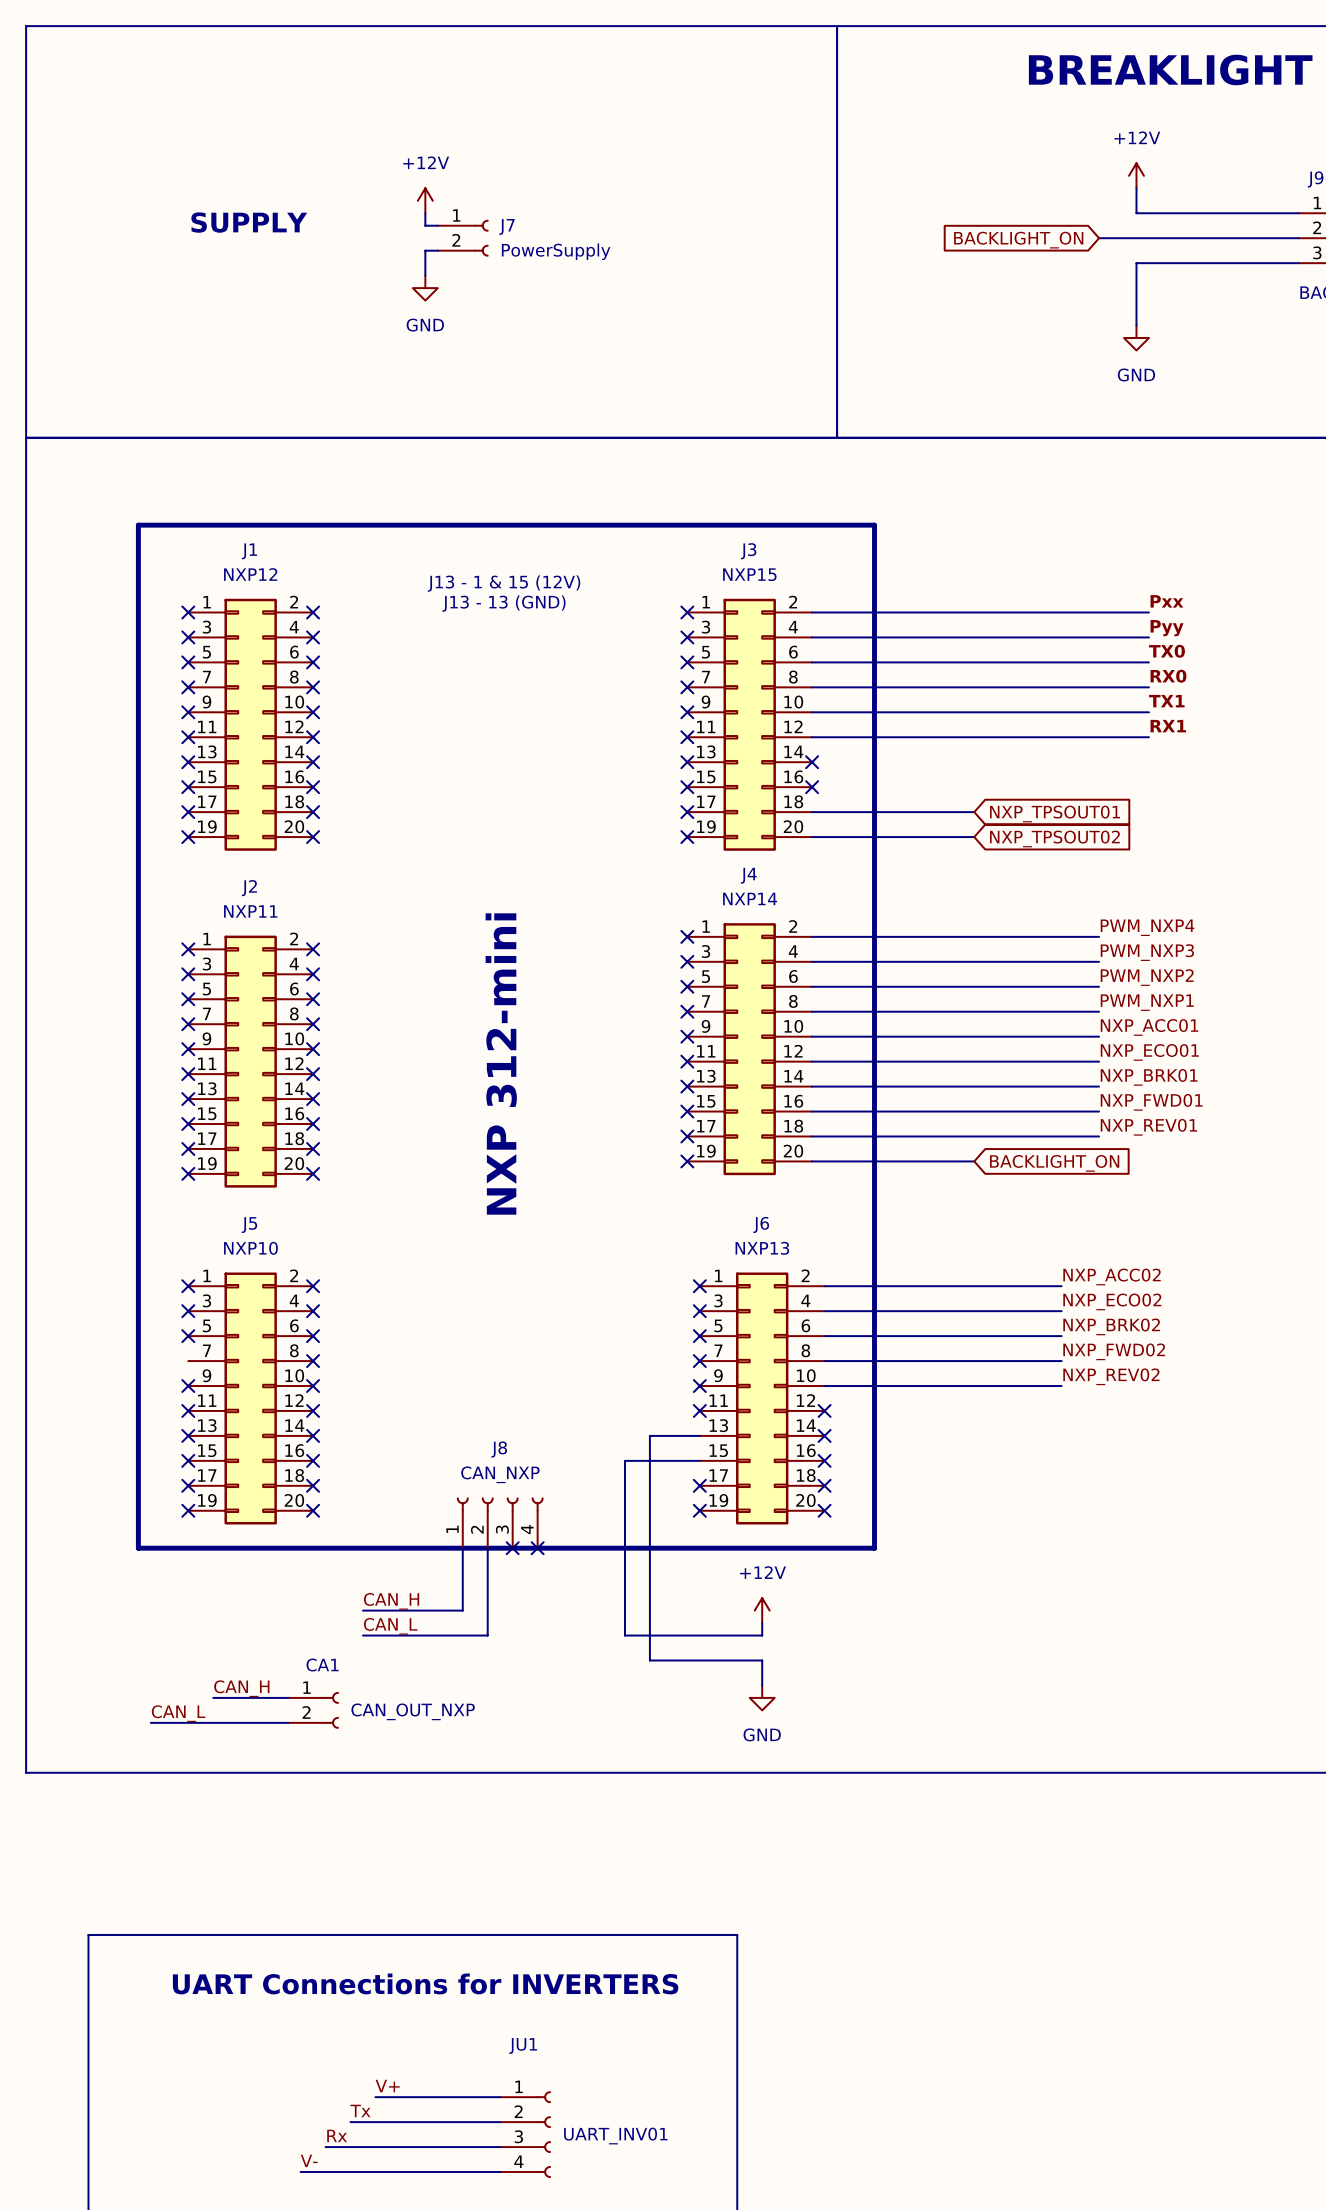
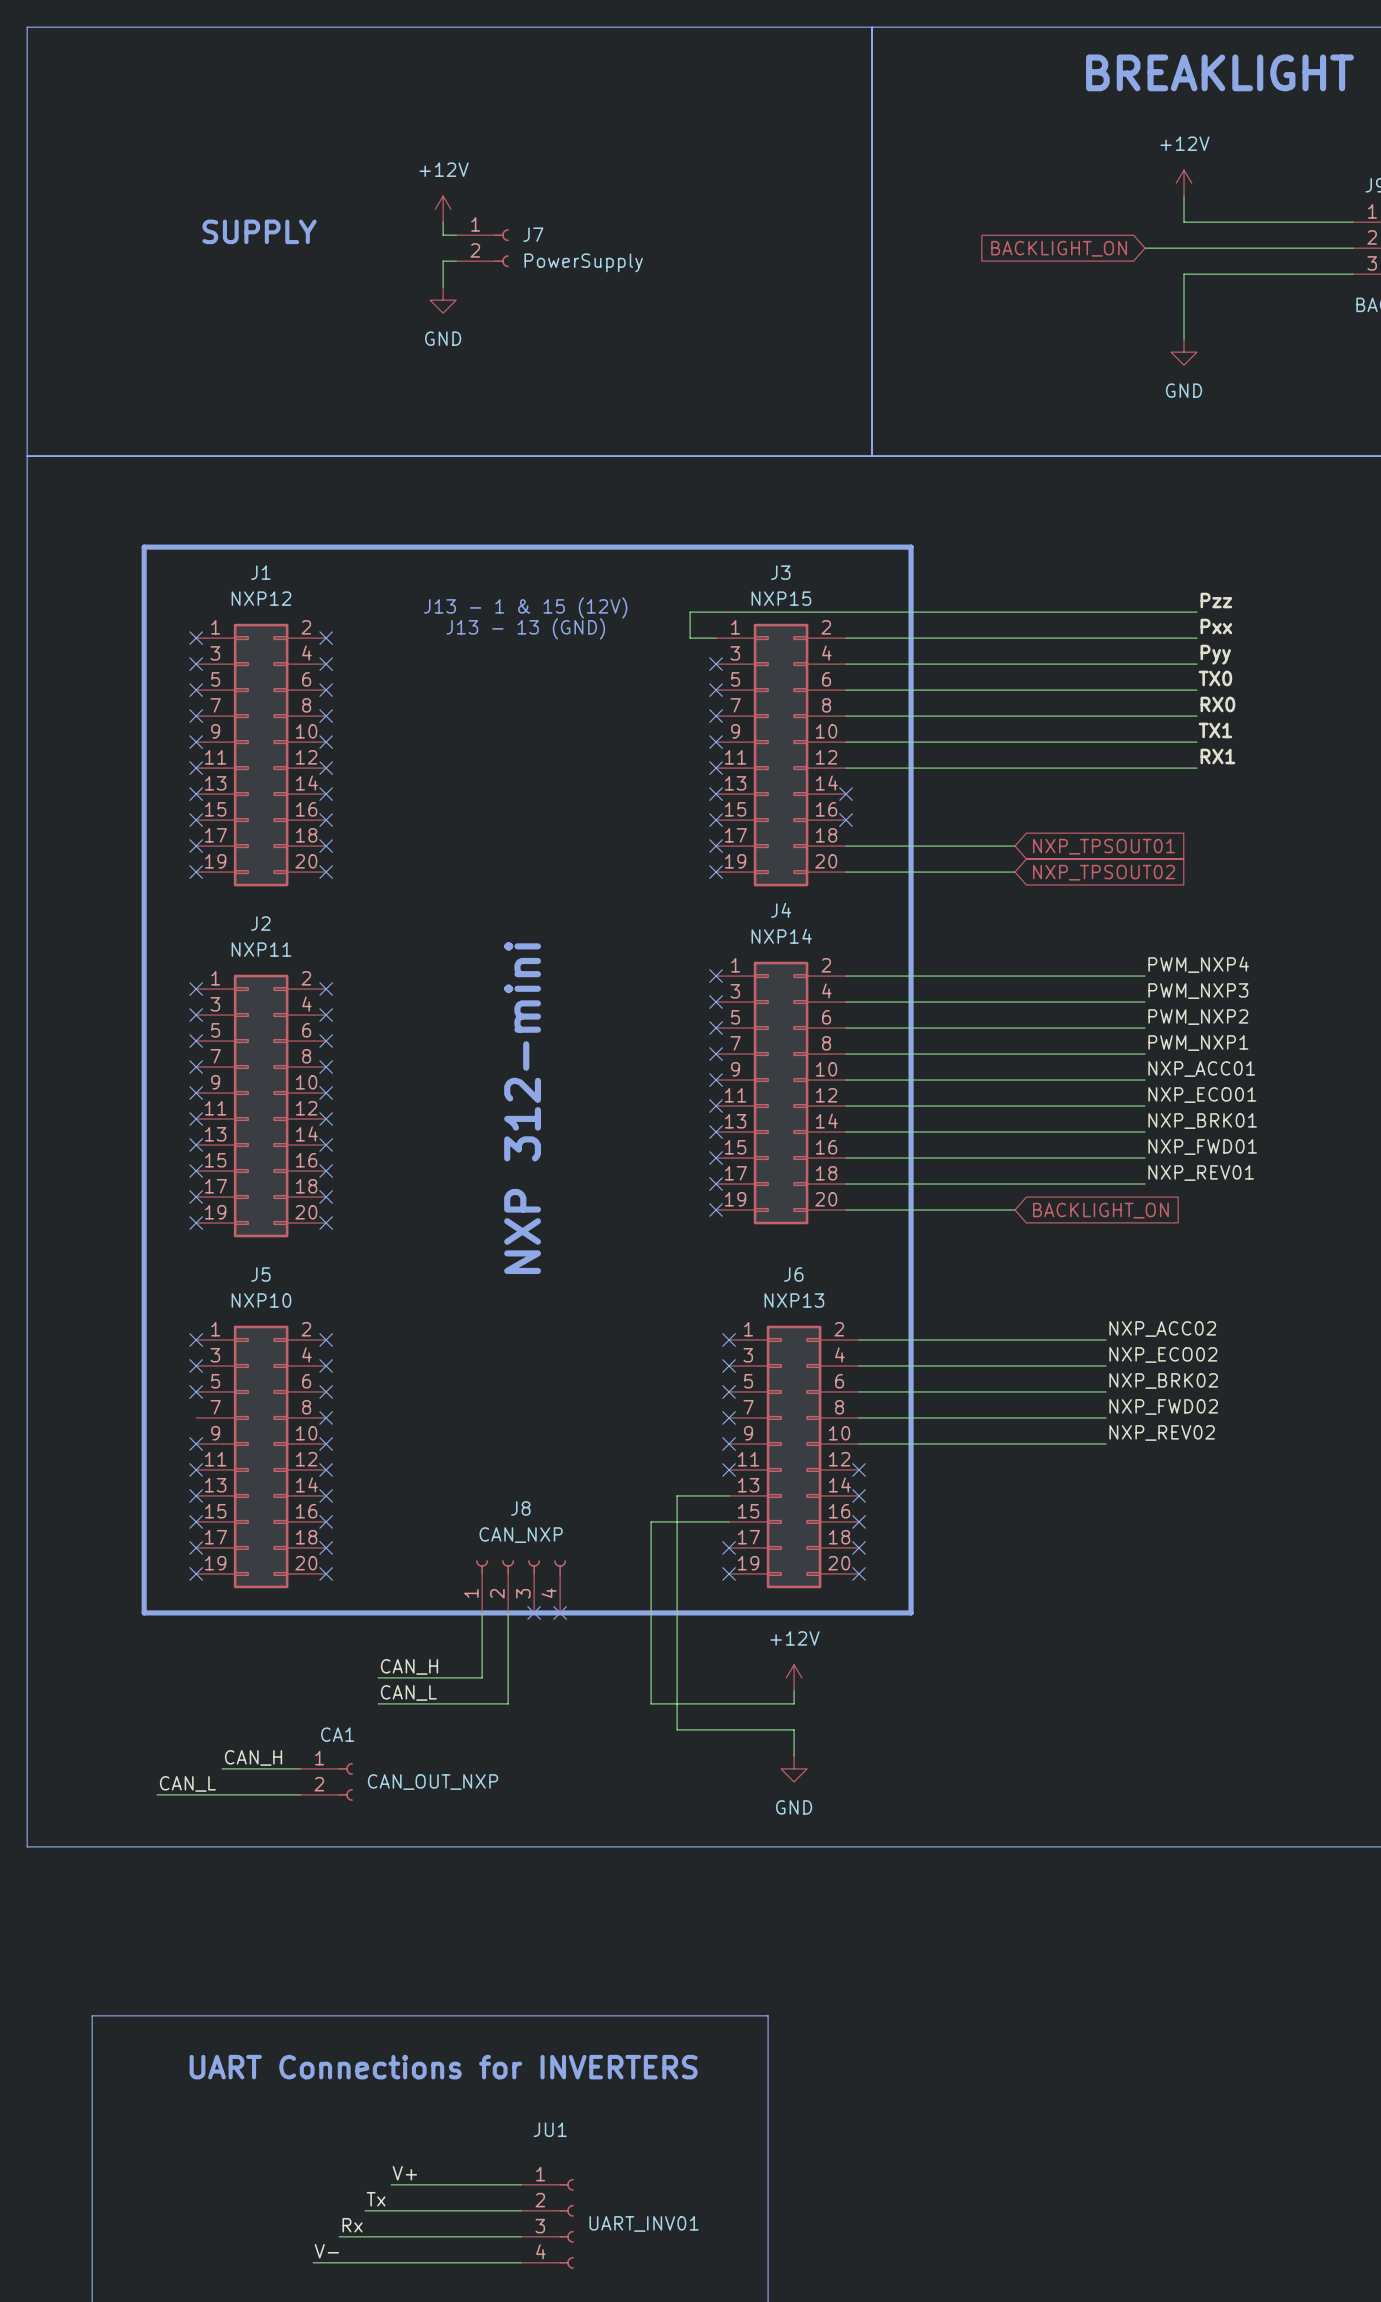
label: none -> Pzz (1216, 600)
wire: none -> (1197, 612) (690, 612) (690, 638) (716, 638)
no-connect mark: (687, 612) -> none

